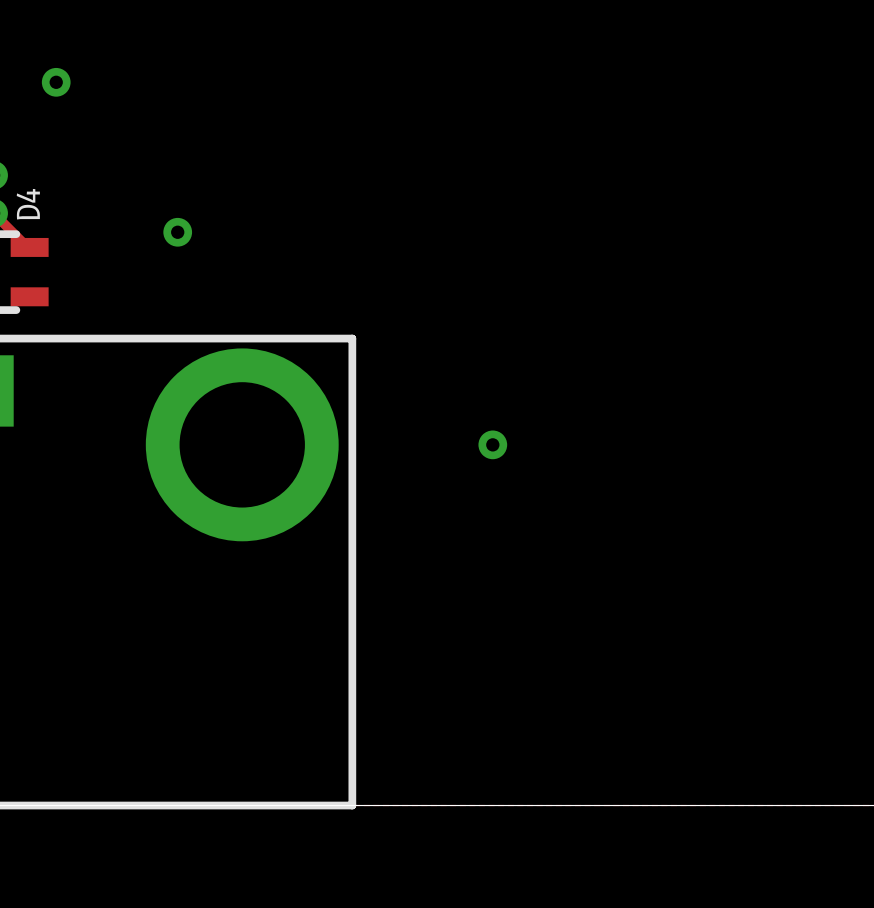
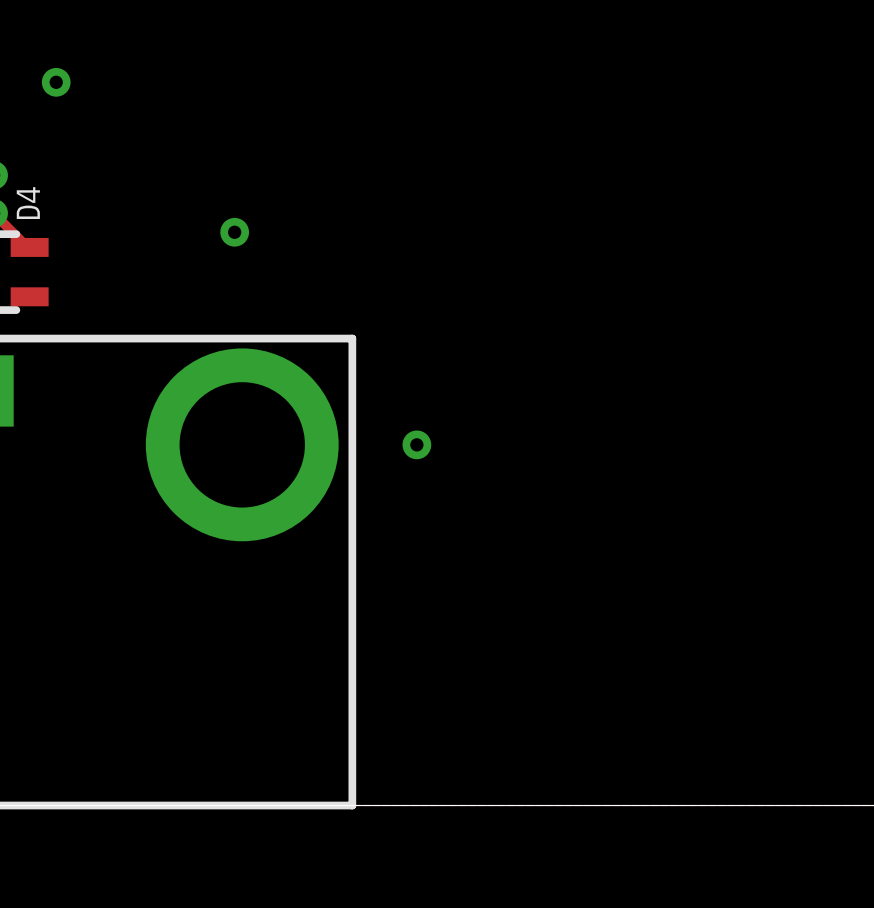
via position: (177, 232) -> (234, 232)
via position: (492, 444) -> (416, 444)

